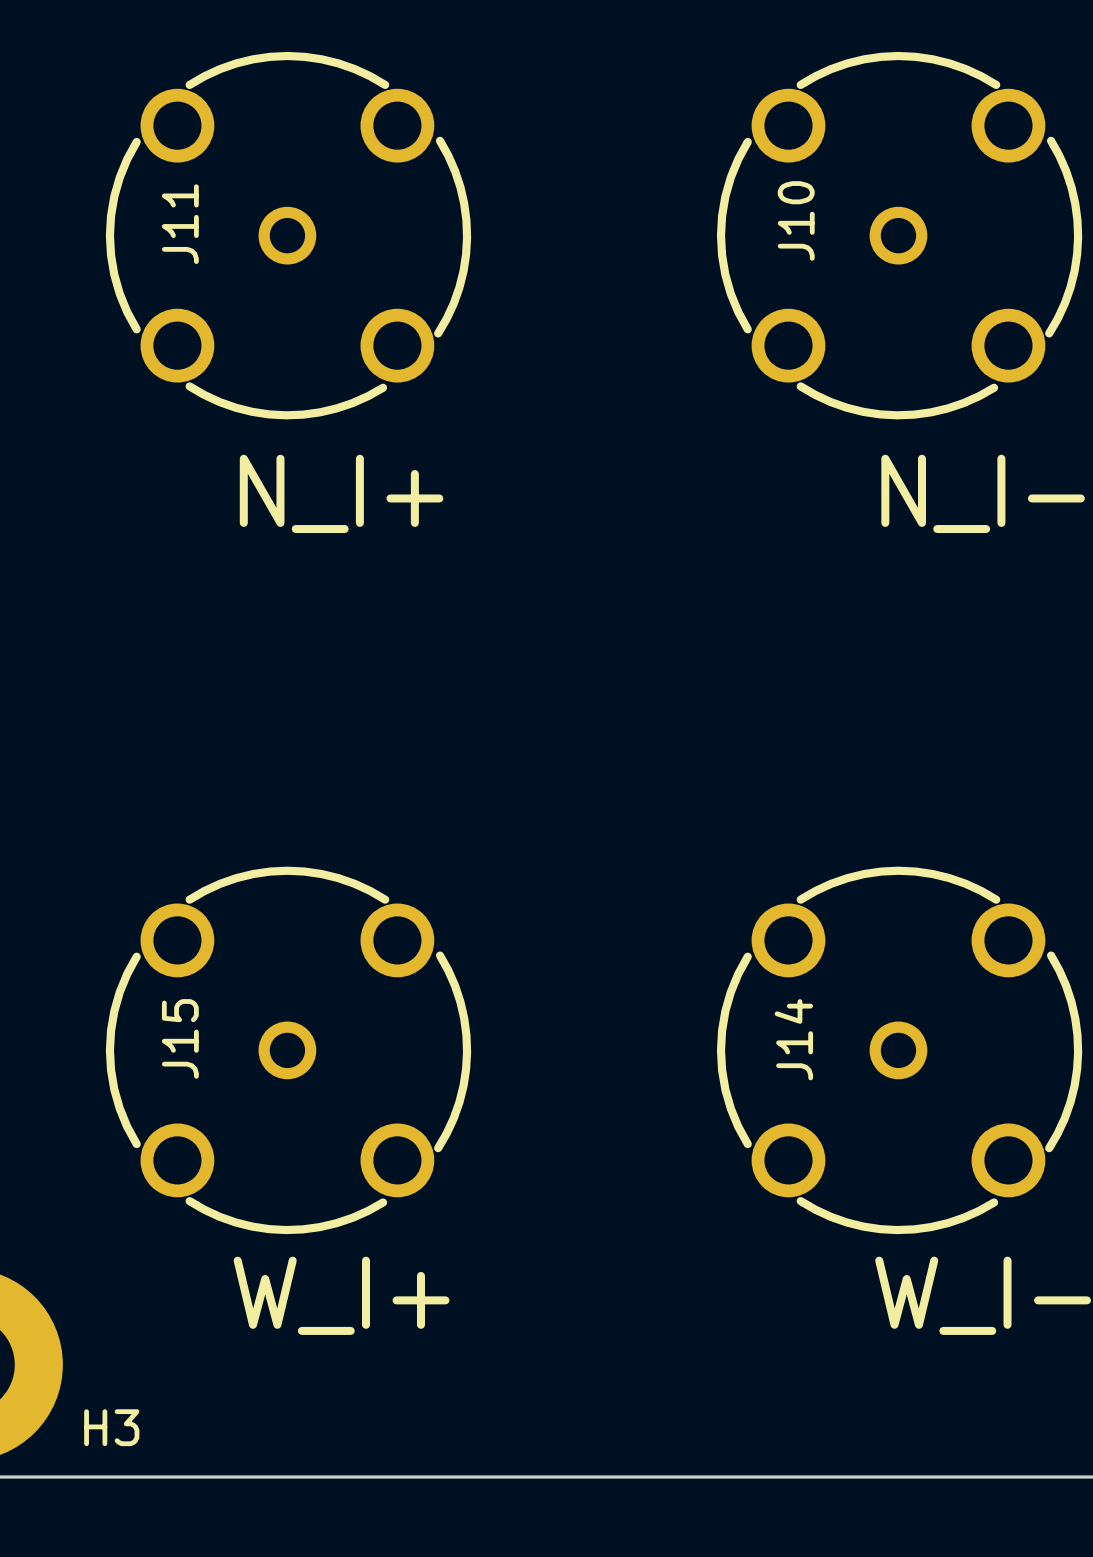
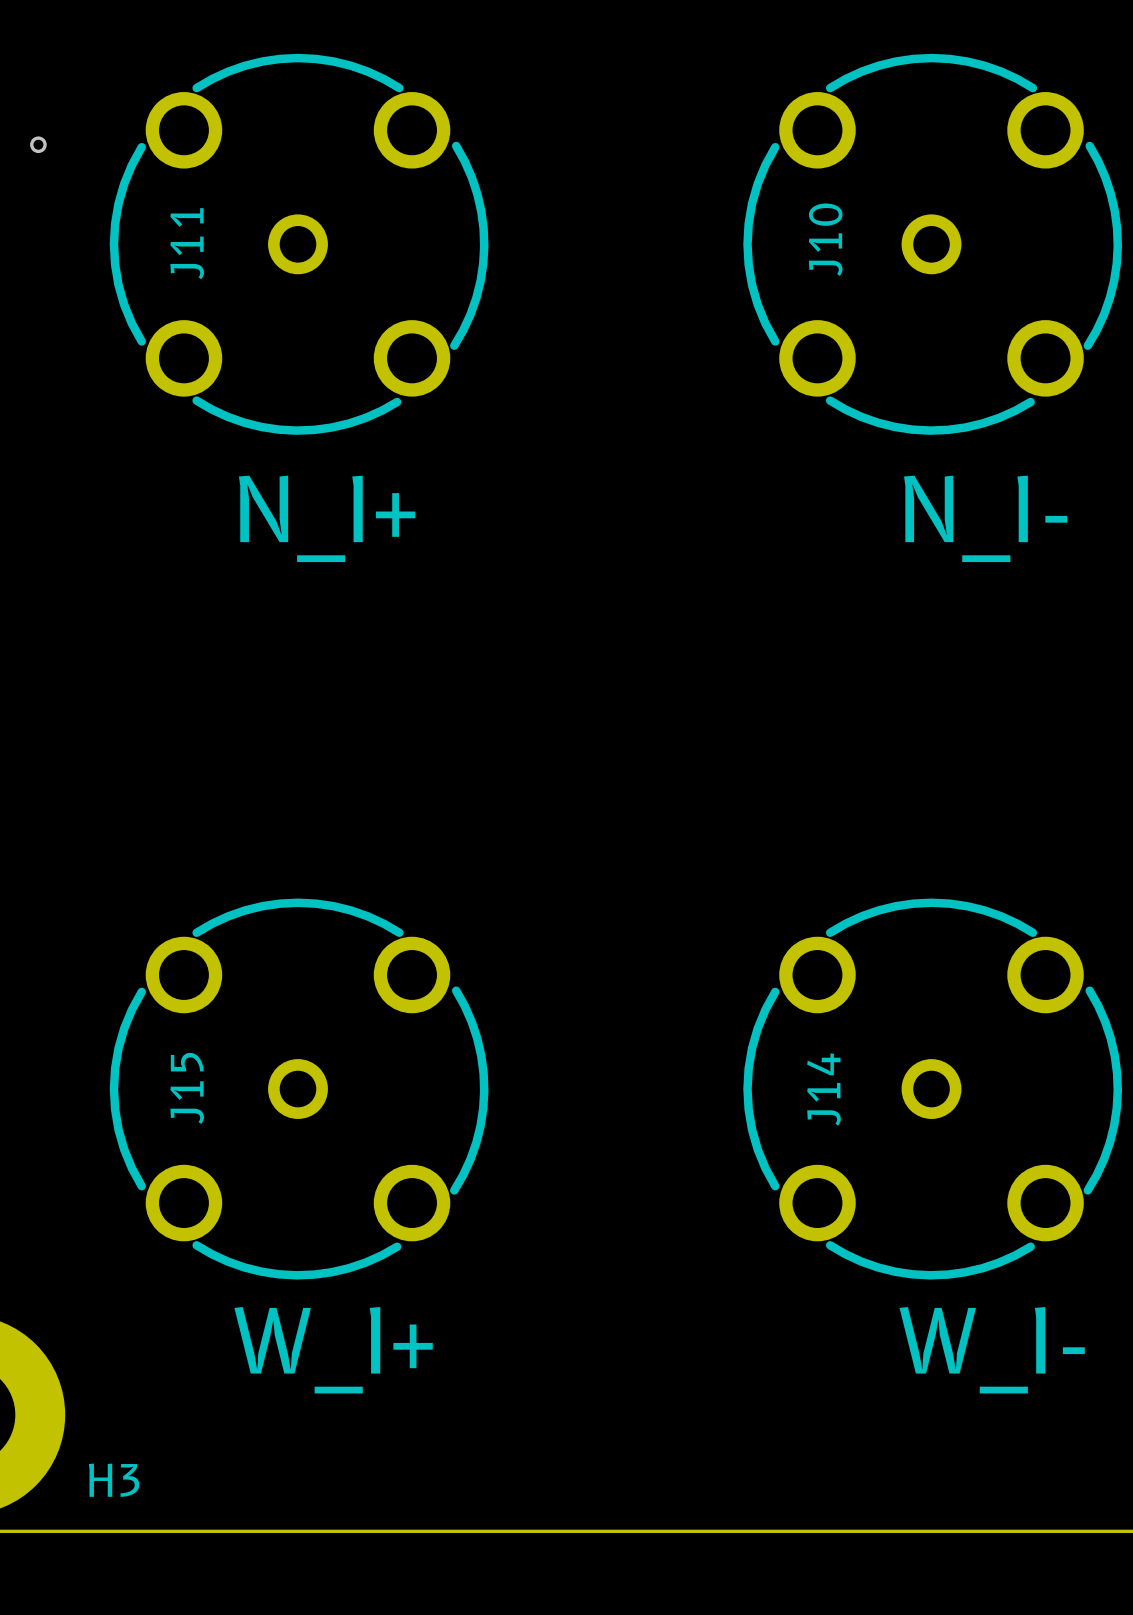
via: none -> (38, 144)

